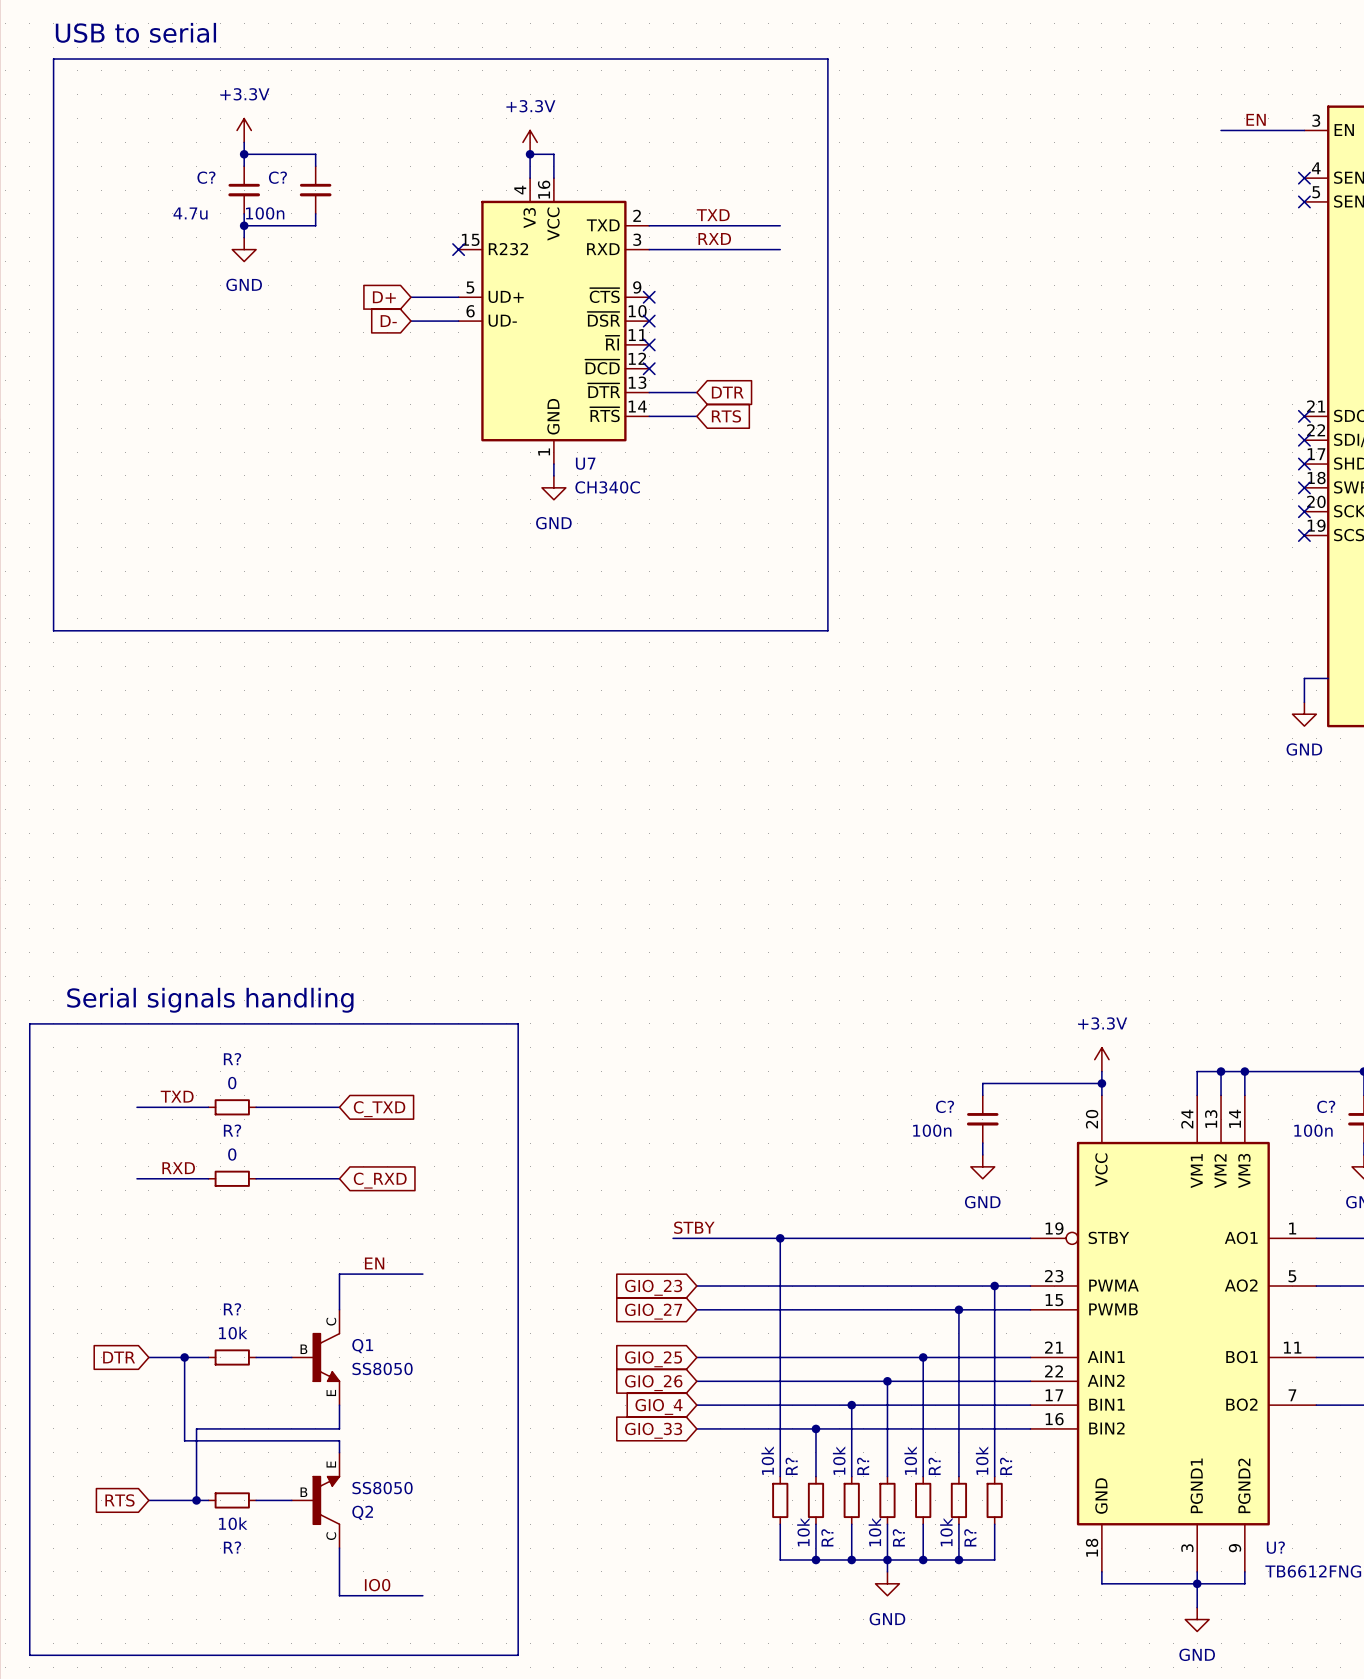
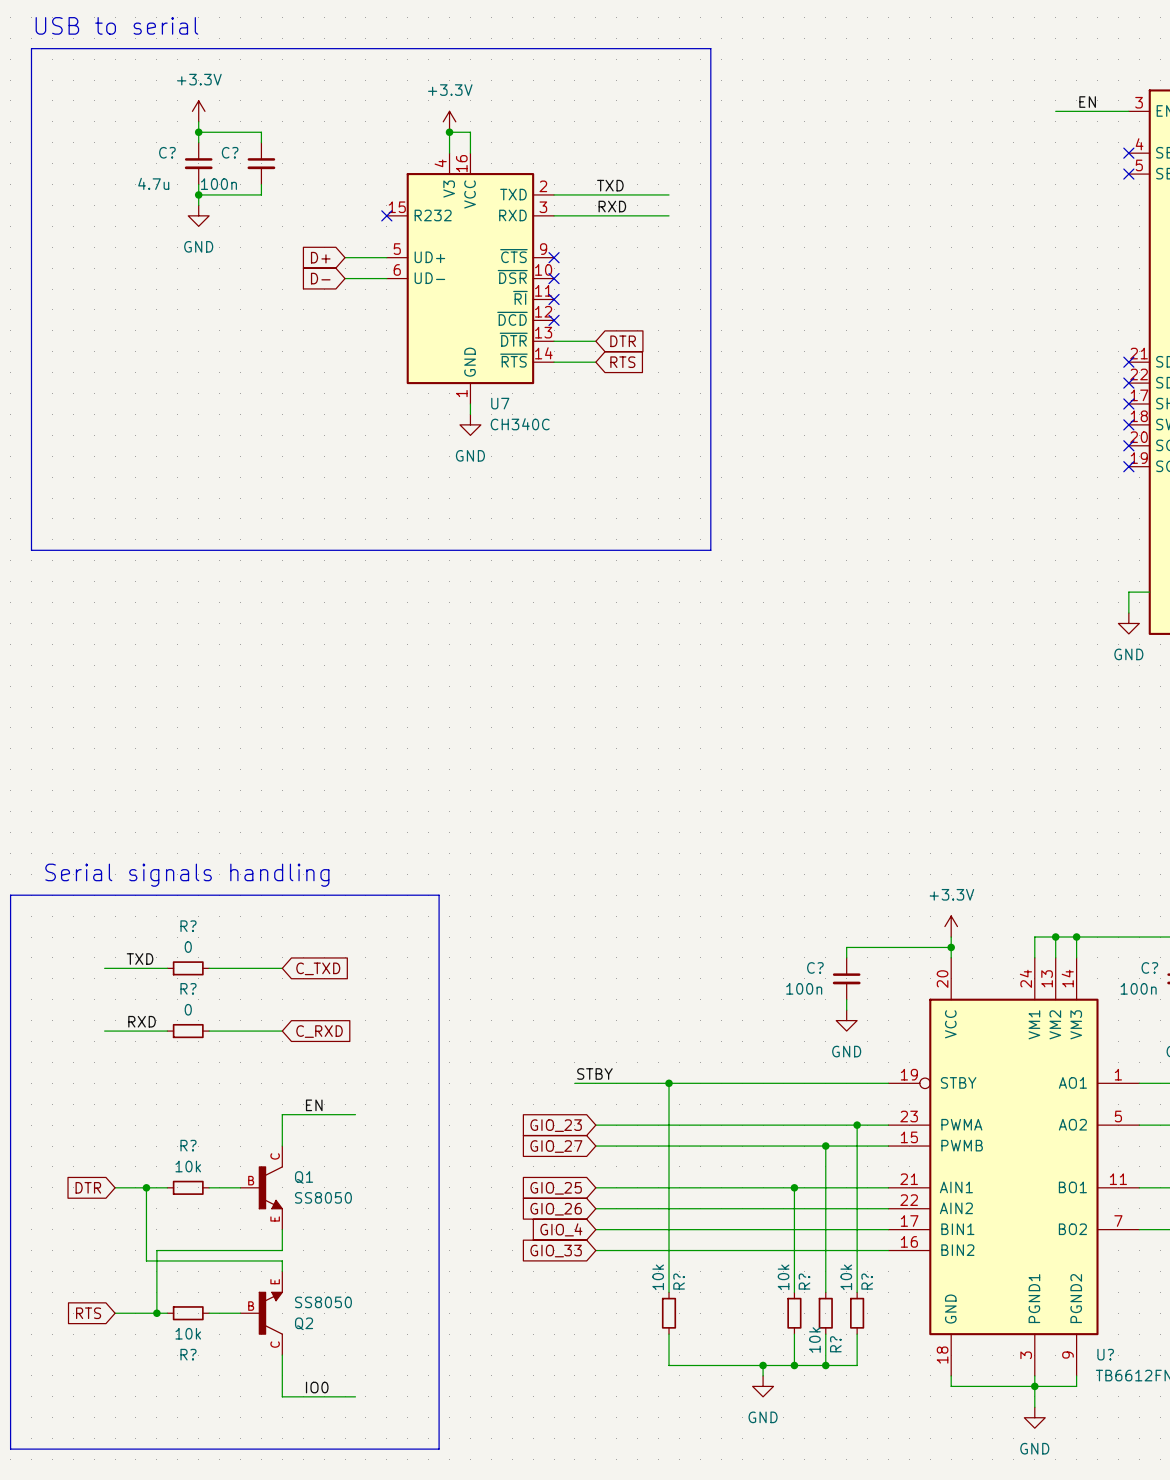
wire: (887, 1381) (887, 1476) -> none
junction: (887, 1381) -> none
wire: (851, 1405) (851, 1476) -> none
junction: (851, 1405) -> none
wire: (815, 1428) (815, 1476) -> none
junction: (815, 1428) -> none
R?: 10k (815, 1500) -> none
R?: 10k (851, 1500) -> none
R?: 10k (887, 1500) -> none
wire: (815, 1524) (815, 1559) -> none
wire: (851, 1524) (851, 1559) -> none
wire: (887, 1524) (887, 1559) -> none
junction: (815, 1559) -> none
junction: (851, 1559) -> none

